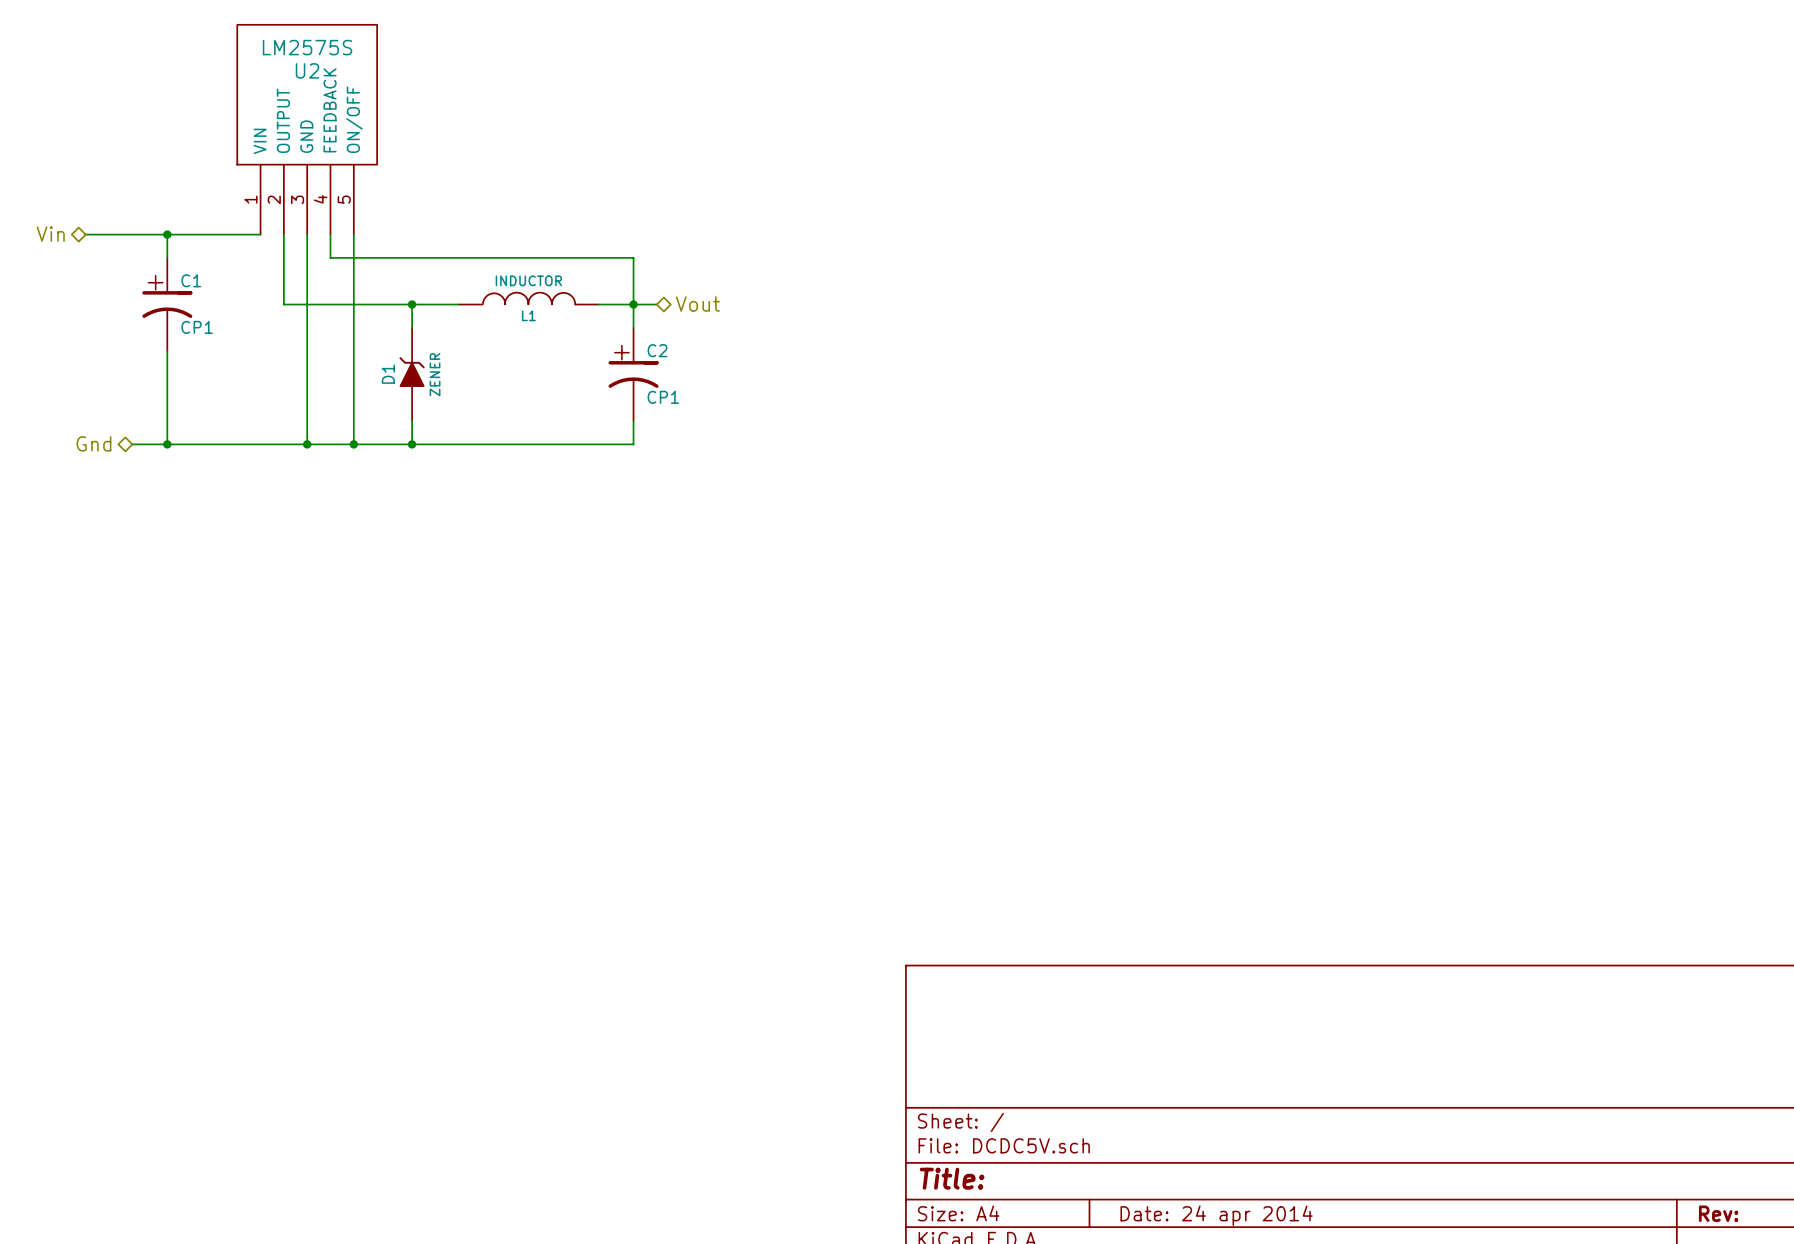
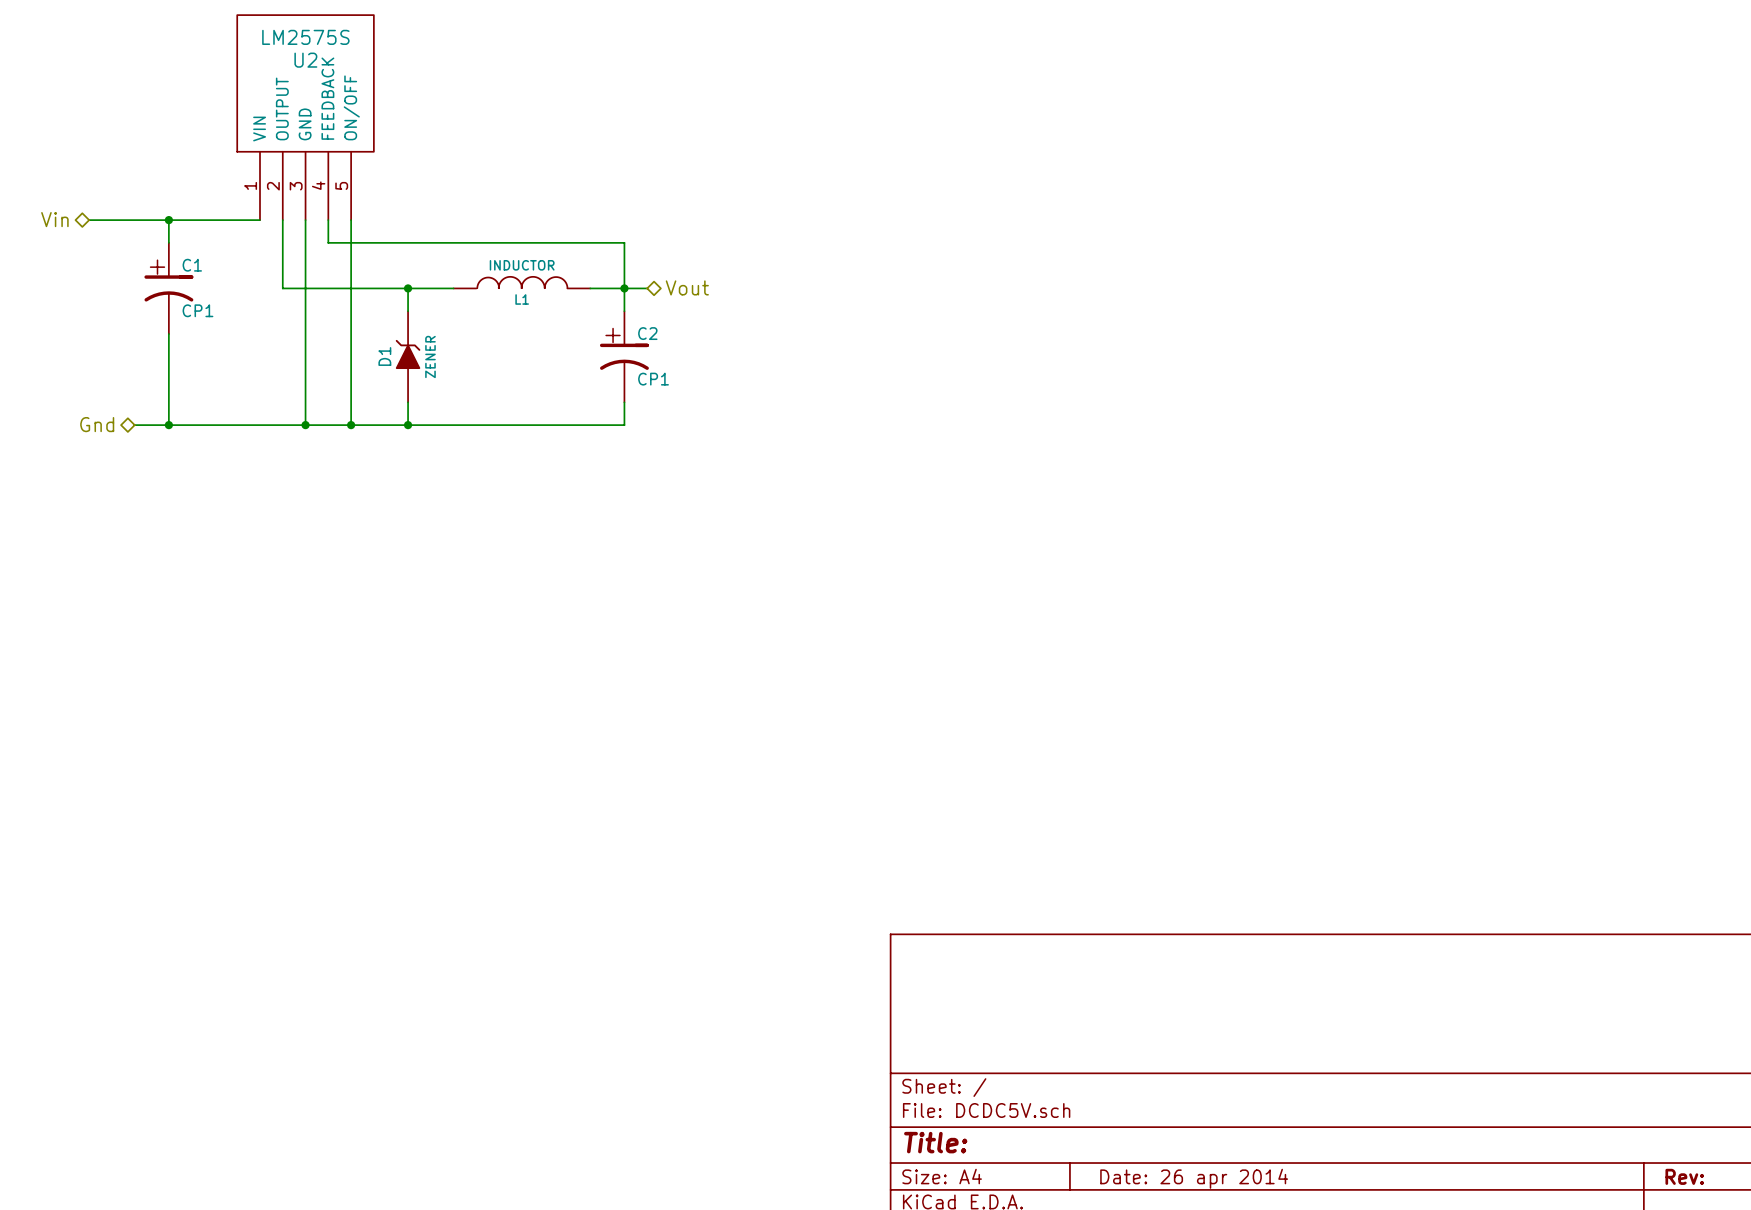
title block: Date: 24 apr 2014 (1216, 1215) -> Date: 26 apr 2014 (1194, 1178)

